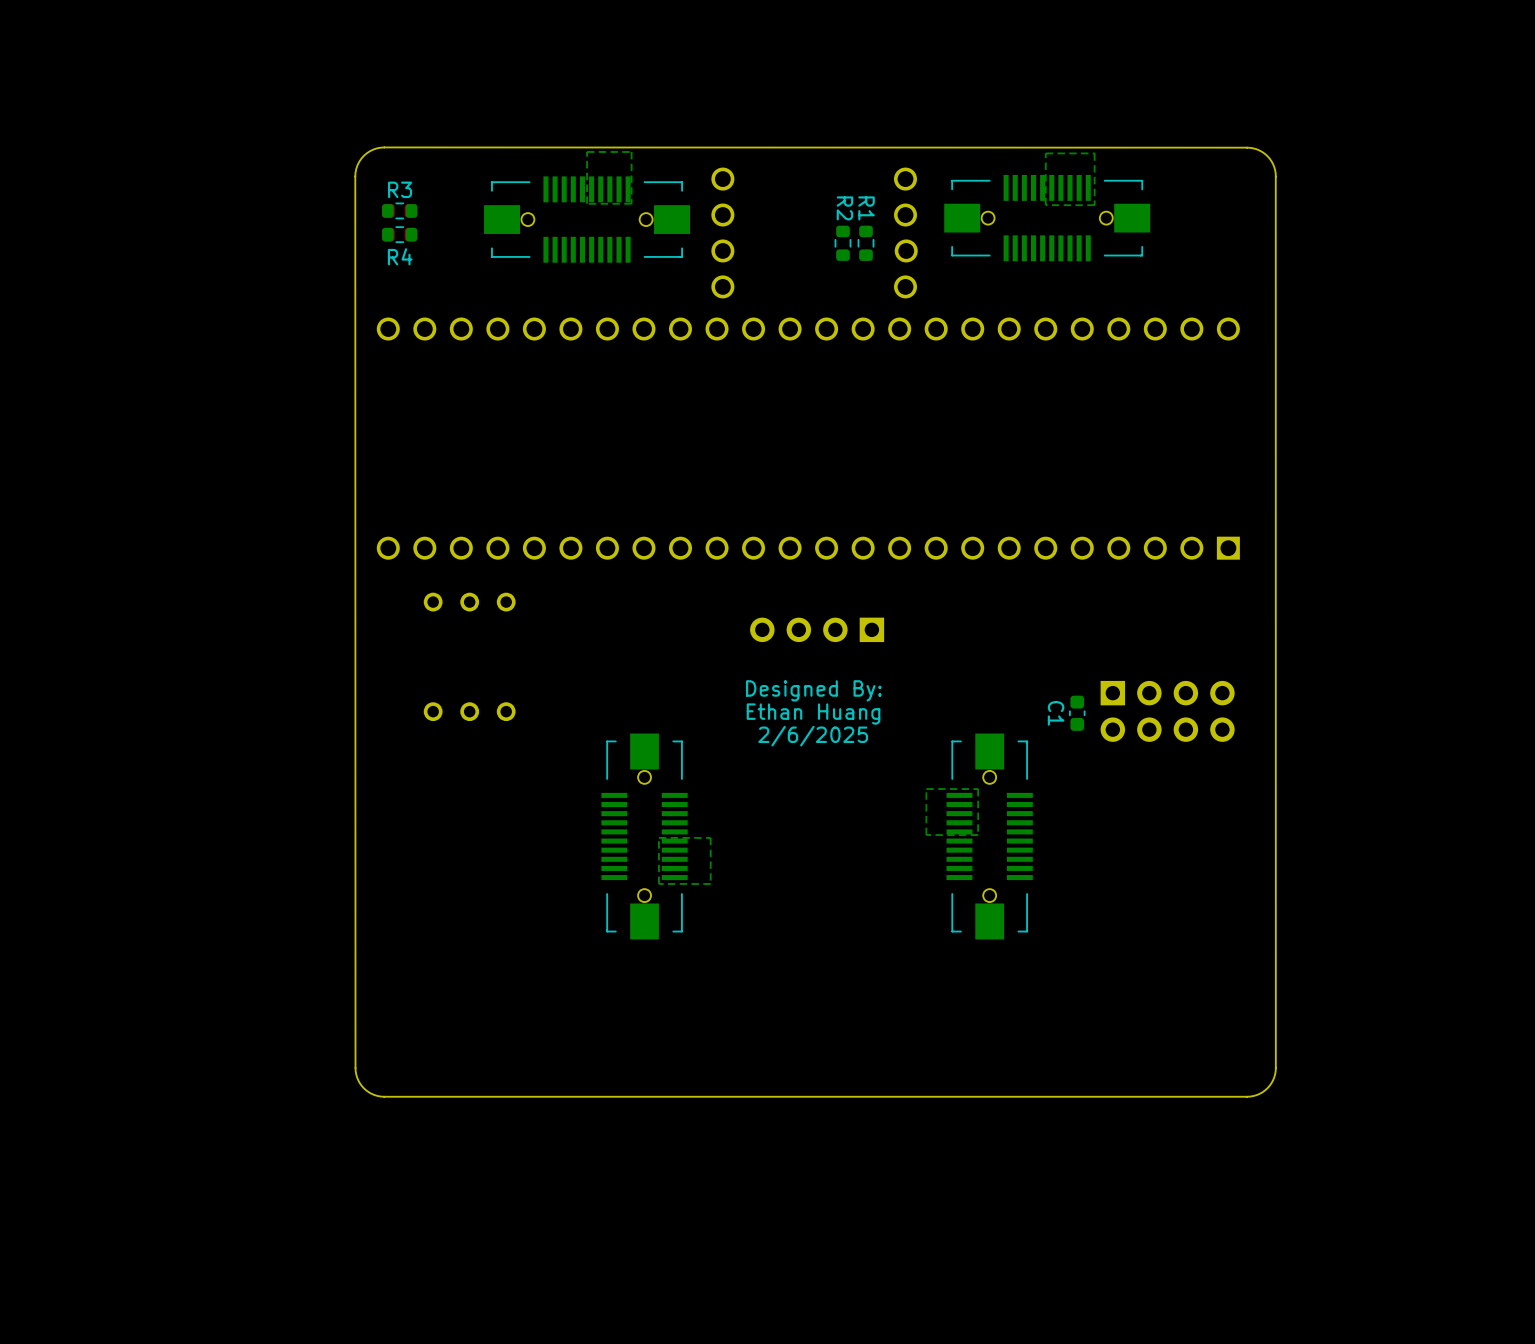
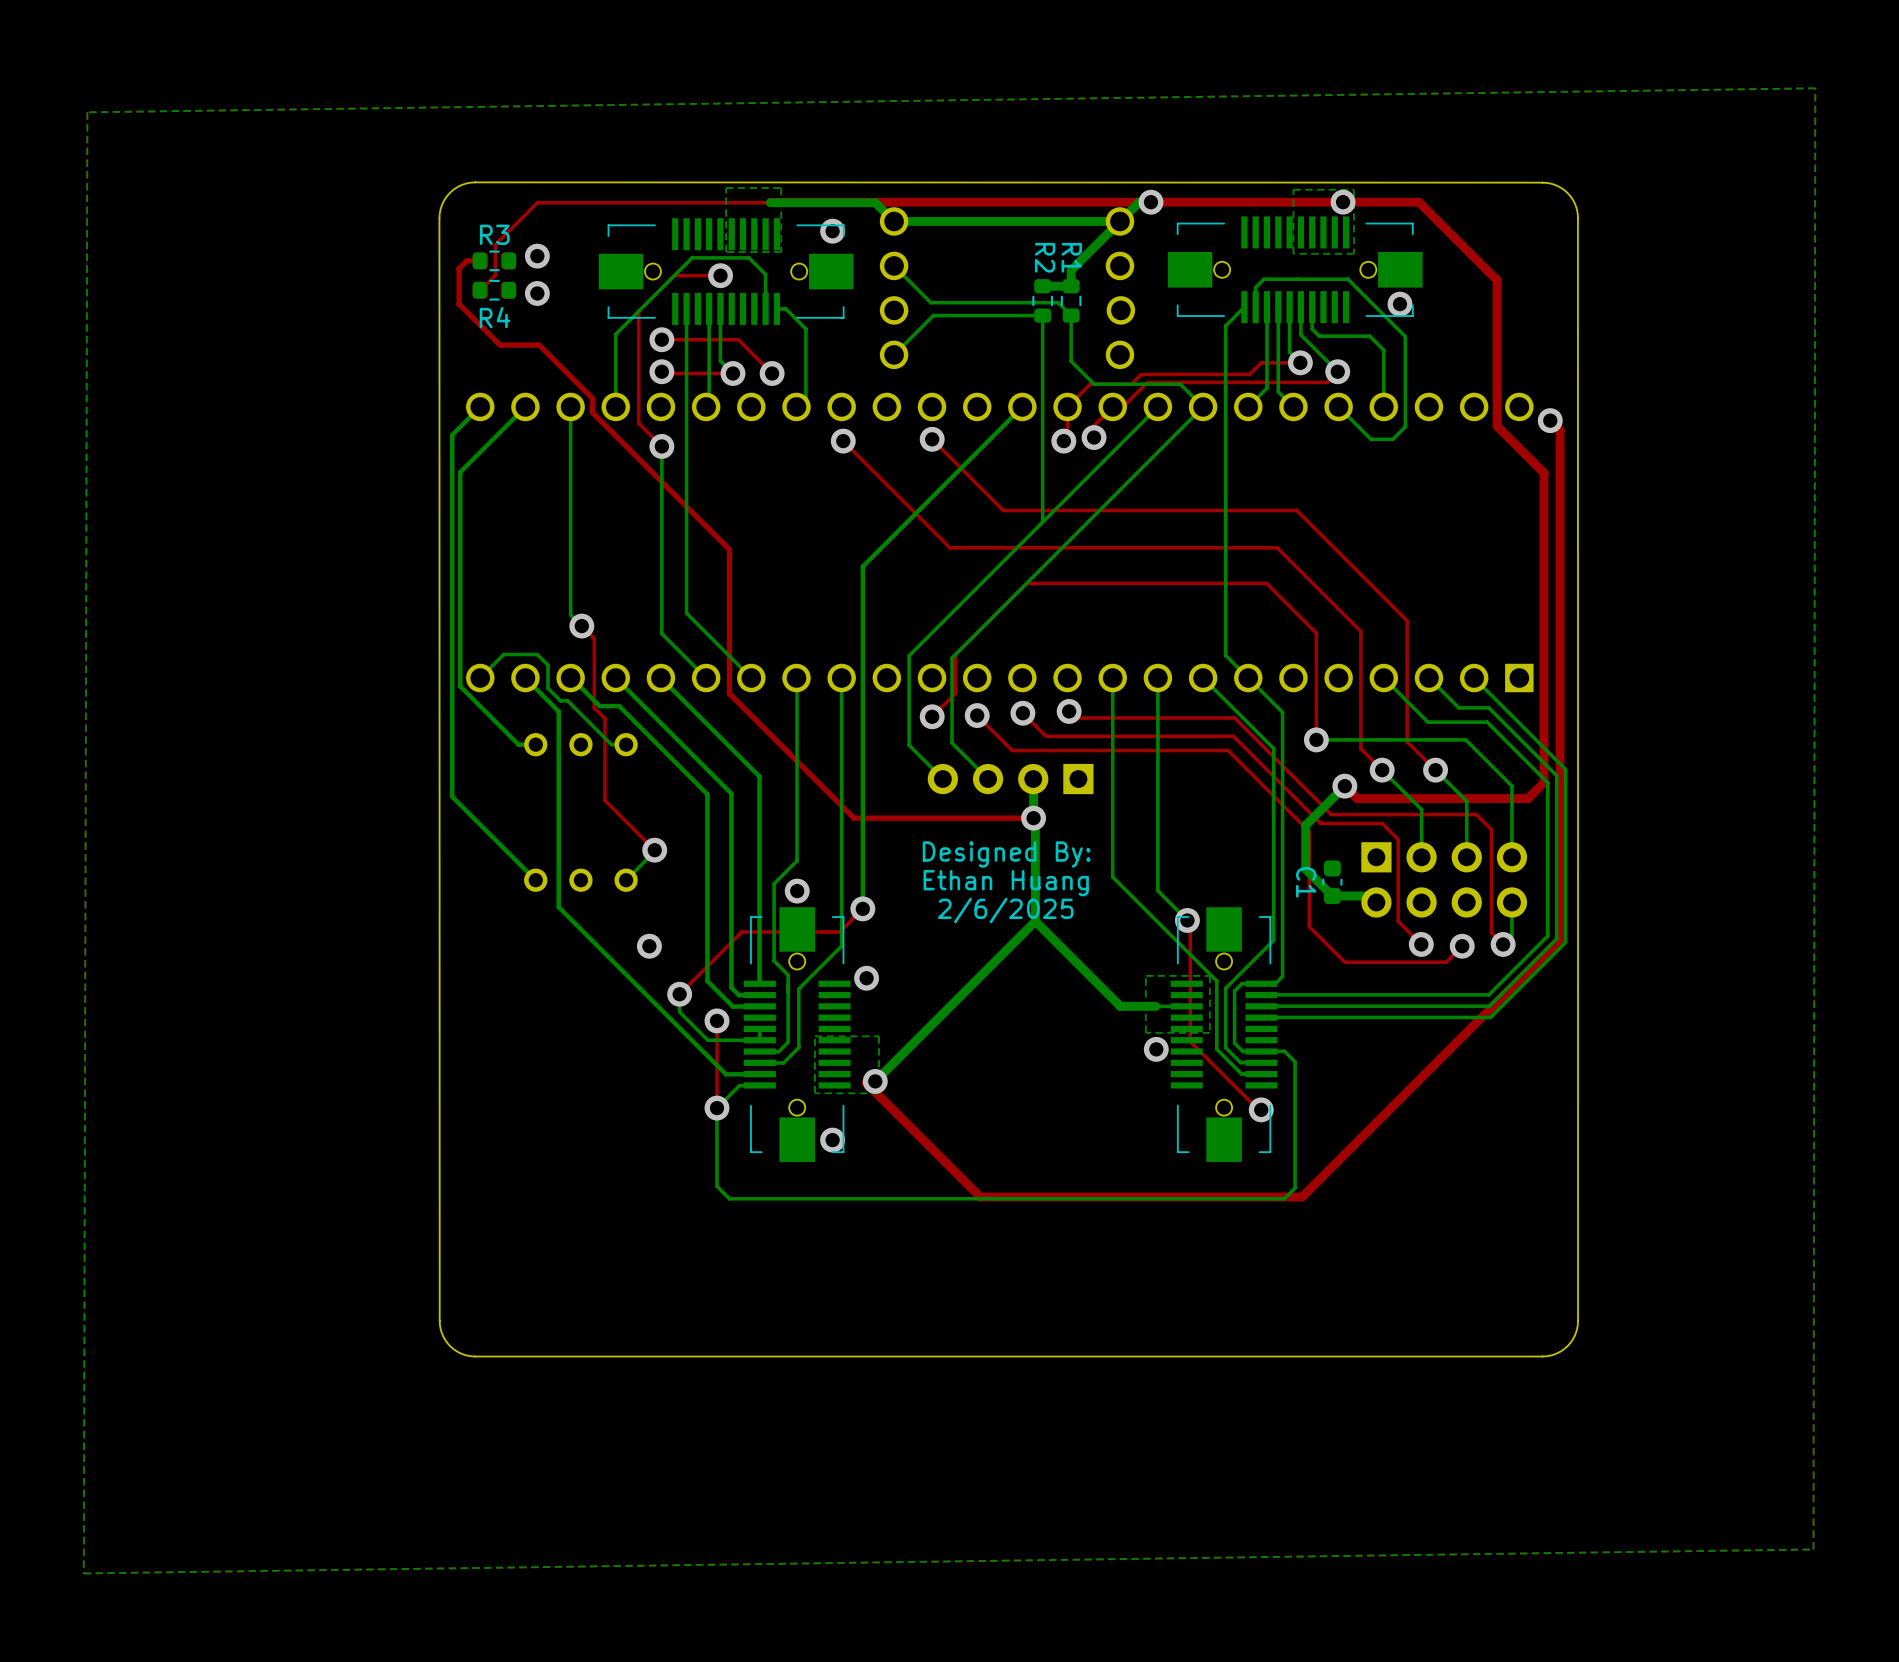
bottom zone outline: none -> (1815, 88) (1813, 1549) (83, 1573) (87, 112) (1815, 88)
bottom track: none -> (770, 202) (875, 202) (894, 221) (1119, 221)
bottom track: none -> (1150, 202) (1139, 202) (1071, 270) (1071, 286) (1042, 286)
via: none -> (1150, 202)
via: none -> (1343, 202)
via: none -> (832, 231)
via: none -> (537, 256)
top track: none -> (480, 260) (466, 260) (459, 268) (459, 304) (500, 345) (539, 345) (592, 398) (592, 412) (729, 549) (729, 693) (853, 818) (1033, 818)
bottom track: none -> (894, 265) (930, 302) (1058, 302) (1071, 315) (1071, 361) (1094, 384) (1180, 384) (1203, 406) (952, 658) (952, 743) (988, 779)
top track: none -> (720, 275) (674, 275) (638, 311) (638, 423) (661, 446)
via: none -> (720, 275)
top track: none -> (480, 290) (495, 275) (495, 244) (537, 202) (1418, 202) (1497, 280) (1497, 426) (1544, 473) (1544, 782) (1528, 798) (1357, 798) (1344, 786)
via: none -> (537, 293)
via: none -> (1399, 304)
bottom track: none -> (1244, 307) (1225, 325) (1225, 655) (1282, 712) (1282, 976) (1275, 983) (1261, 983)
bottom track: none -> (1255, 307) (1255, 287) (1264, 279) (1347, 279) (1405, 336) (1405, 426) (1392, 439) (1370, 439) (1338, 406)
bottom track: none -> (1267, 307) (1267, 388) (1248, 406)
bottom track: none -> (1278, 307) (1278, 391) (1293, 406)
bottom track: none -> (1289, 307) (1289, 352) (1300, 362)
bottom track: none -> (1300, 307) (1300, 334) (1337, 371)
bottom track: none -> (1312, 307) (1312, 329) (1319, 336) (1369, 336) (1383, 350) (1383, 406)
bottom track: none -> (686, 308) (686, 613) (751, 678)
bottom track: none -> (709, 308) (709, 403) (706, 406)
bottom track: none -> (720, 308) (720, 360) (733, 373)
bottom track: none -> (765, 308) (765, 274) (749, 257) (692, 257) (615, 334) (615, 406)
bottom track: none -> (776, 308) (785, 308) (805, 329) (805, 397) (796, 406)
top track: none -> (661, 339) (738, 339) (772, 373)
via: none -> (661, 339)
bottom track: none -> (894, 354) (933, 315) (1042, 315) (1042, 522)
top track: none -> (1300, 362) (1261, 362) (1249, 374) (1141, 374) (1131, 384) (1090, 384) (1067, 406) (1067, 437) (1063, 441)
via: none -> (1300, 362)
top track: none -> (661, 371) (663, 373) (733, 373)
via: none -> (661, 371)
top track: none -> (1337, 371) (1327, 382) (1147, 382) (1122, 407) (1112, 406) (1094, 425) (1094, 437)
via: none -> (1337, 371)
via: none -> (733, 373)
via: none -> (772, 373)
bottom track: none -> (480, 406) (452, 434) (452, 796) (535, 880)
bottom track: none -> (525, 406) (460, 472) (460, 686) (518, 744) (535, 744)
bottom track: none -> (570, 406) (570, 614) (581, 626)
bottom track: none -> (1022, 406) (862, 566) (862, 908)
bottom track: none -> (1157, 406) (909, 655) (909, 745) (942, 779)
top track: none -> (1550, 420) (1560, 430) (1560, 939) (1302, 1197) (980, 1197) (866, 1083) (875, 1081)
via: none -> (1550, 420)
via: none -> (1094, 437)
top track: none -> (932, 439) (1003, 510) (1296, 510) (1407, 620) (1407, 741) (1435, 770)
via: none -> (932, 439)
top track: none -> (843, 441) (949, 547) (1277, 547) (1360, 631) (1360, 748) (1382, 770)
via: none -> (843, 441)
via: none -> (1063, 441)
bottom track: none -> (661, 446) (661, 633) (706, 678)
via: none -> (661, 446)
top track: none -> (581, 626) (594, 638) (594, 707) (604, 718) (604, 800) (654, 850)
via: none -> (581, 626)
bottom track: none -> (480, 678) (503, 654) (537, 654) (548, 665) (548, 688) (560, 700) (567, 700) (611, 744) (626, 744)
bottom track: none -> (525, 678) (558, 711) (558, 907) (725, 1074) (759, 1074)
bottom track: none -> (570, 678) (599, 706) (619, 706) (707, 794) (707, 981) (732, 1006) (759, 1006)
bottom track: none -> (615, 678) (731, 793) (731, 987) (739, 995) (759, 995)
bottom track: none -> (660, 678) (759, 776) (759, 983)
bottom track: none -> (796, 678) (797, 860) (774, 883) (774, 961) (788, 975) (788, 1042) (778, 1051) (759, 1051)
bottom track: none -> (841, 678) (841, 946) (798, 988) (798, 1047) (783, 1063) (759, 1063)
bottom track: none -> (1112, 678) (1112, 877) (1216, 981) (1216, 1049) (1241, 1073) (1261, 1073)
bottom track: none -> (1157, 678) (1157, 890) (1187, 920)
bottom track: none -> (1203, 678) (1273, 748) (1273, 940) (1225, 988) (1225, 1047) (1240, 1062) (1261, 1062)
bottom track: none -> (1383, 678) (1427, 722) (1487, 722) (1547, 782) (1547, 935) (1488, 994) (1261, 994)
bottom track: none -> (1428, 678) (1458, 707) (1488, 707) (1556, 775) (1556, 938) (1489, 1006) (1261, 1006)
bottom track: none -> (1474, 678) (1565, 769) (1565, 942) (1490, 1017) (1261, 1017)
top track: none -> (1069, 711) (1075, 718) (1234, 718) (1331, 814) (1476, 814) (1491, 829) (1491, 932) (1503, 944)
via: none -> (1069, 711)
top track: none -> (1022, 713) (1046, 736) (1233, 736) (1320, 823) (1382, 823) (1398, 839) (1398, 921) (1421, 944)
via: none -> (1022, 713)
top track: none -> (977, 715) (1012, 750) (1228, 750) (1309, 831) (1309, 864)
via: none -> (977, 715)
top track: none -> (932, 716) (955, 693) (955, 654) (1026, 583) (1266, 583) (1316, 633) (1316, 739)
via: none -> (932, 716)
bottom track: none -> (1316, 739) (1465, 739) (1511, 786) (1511, 857)
via: none -> (1316, 739)
bottom track: none -> (1382, 770) (1421, 809) (1421, 857)
via: none -> (1382, 770)
bottom track: none -> (1435, 770) (1466, 801) (1466, 857)
via: none -> (1435, 770)
bottom track: none -> (1033, 779) (1033, 818) (1035, 819) (1035, 921)
bottom track: none -> (1344, 786) (1305, 825) (1305, 869) (1332, 895) (1369, 895) (1376, 902)
via: none -> (1344, 786)
via: none -> (1033, 818)
bottom track: none -> (654, 850) (626, 880)
via: none -> (654, 850)
top track: none -> (1309, 864) (1309, 926) (1344, 962) (1446, 962) (1462, 946)
via: none -> (797, 891)
bottom track: none -> (1511, 902) (1511, 935) (1503, 944)
top track: none -> (862, 908) (839, 932) (741, 932) (679, 994)
via: none -> (862, 908)
bottom track: none -> (1035, 921) (875, 1081)
bottom track: none -> (1035, 921) (1120, 1006) (1186, 1006)
top track: none -> (1187, 920) (1190, 923) (1190, 1041) (1258, 1109) (1261, 1109)
via: none -> (1187, 920)
via: none -> (1421, 944)
via: none -> (1503, 944)
via: none -> (649, 946)
via: none -> (1462, 946)
via: none -> (866, 978)
bottom track: none -> (1261, 983) (1241, 983) (1234, 991) (1234, 1043) (1242, 1051) (1261, 1051)
bottom track: none -> (679, 994) (679, 1012) (707, 1040) (759, 1040) (759, 1028)
via: none -> (679, 994)
top track: none -> (716, 1020) (716, 1108)
via: none -> (716, 1020)
via: none -> (1156, 1049)
bottom track: none -> (1261, 1051) (1284, 1051) (1295, 1061) (1295, 1188) (1284, 1198) (729, 1198) (716, 1186) (716, 1108) (739, 1085) (759, 1085)
via: none -> (875, 1081)
via: none -> (716, 1108)
via: none -> (1261, 1109)
via: none -> (832, 1140)

